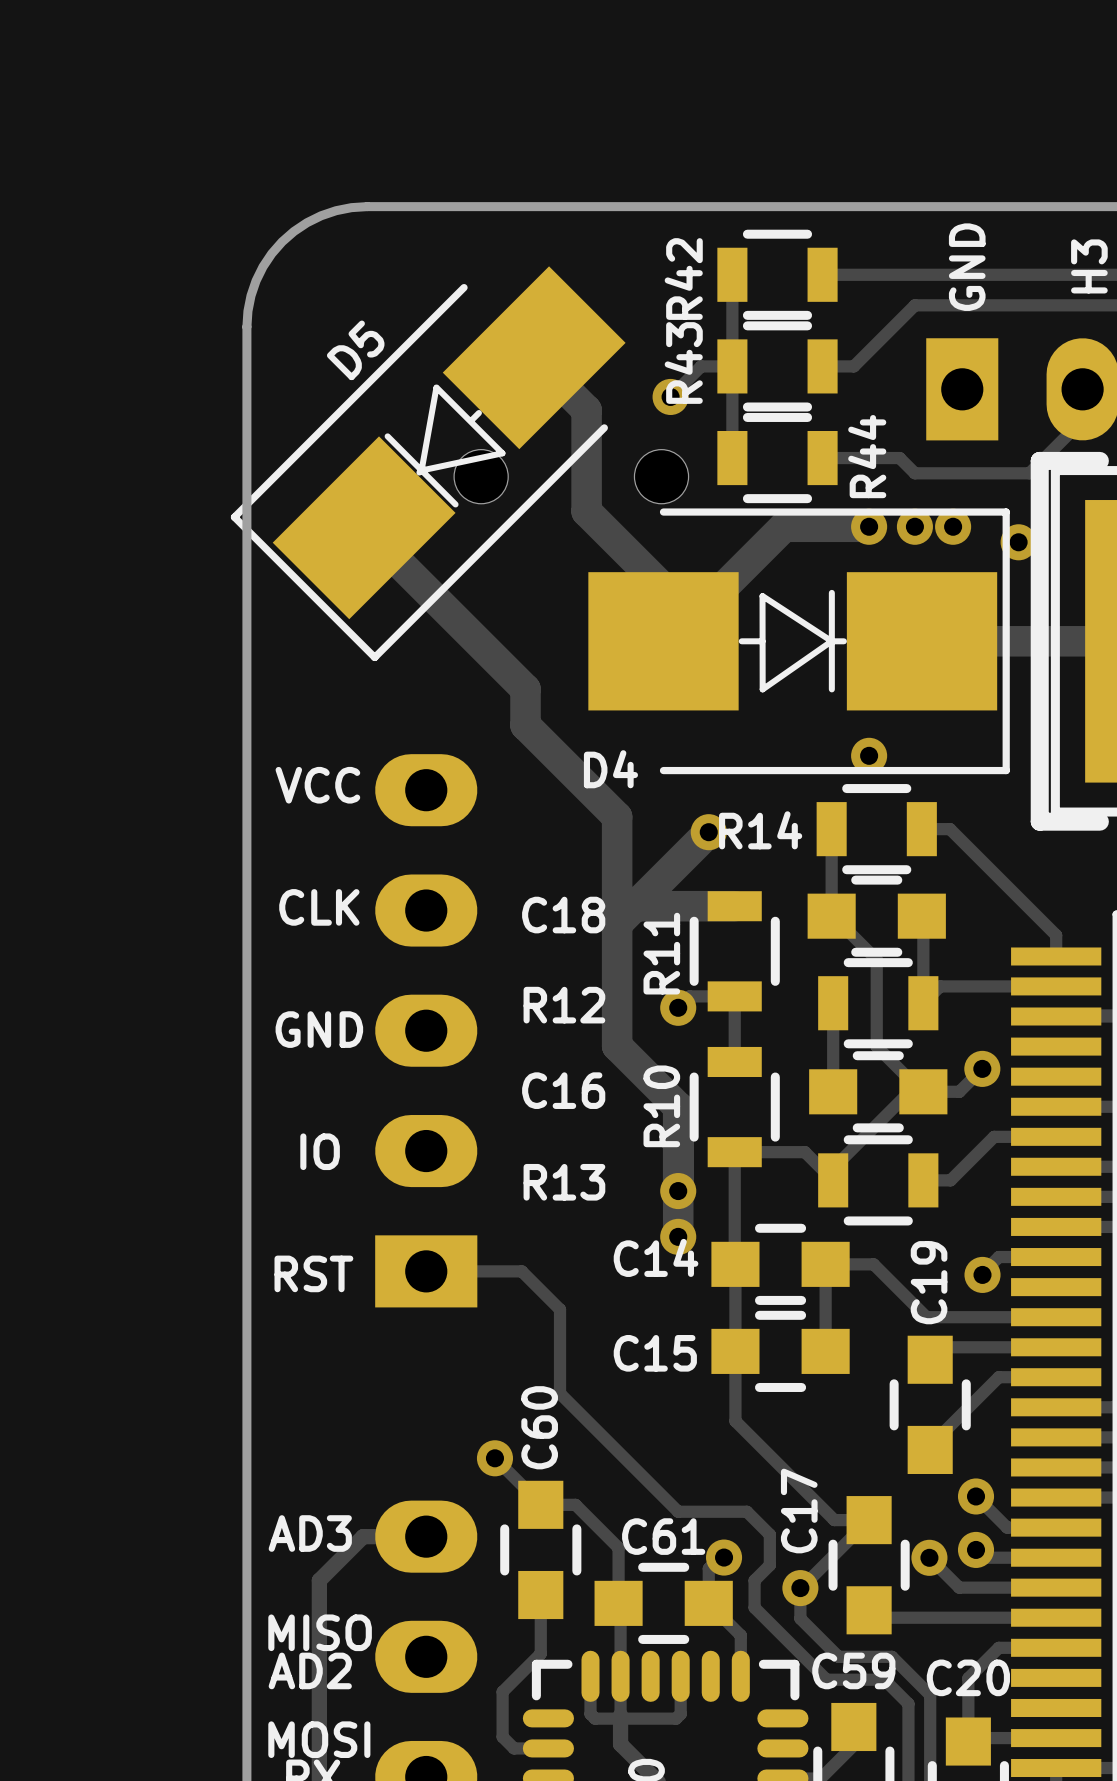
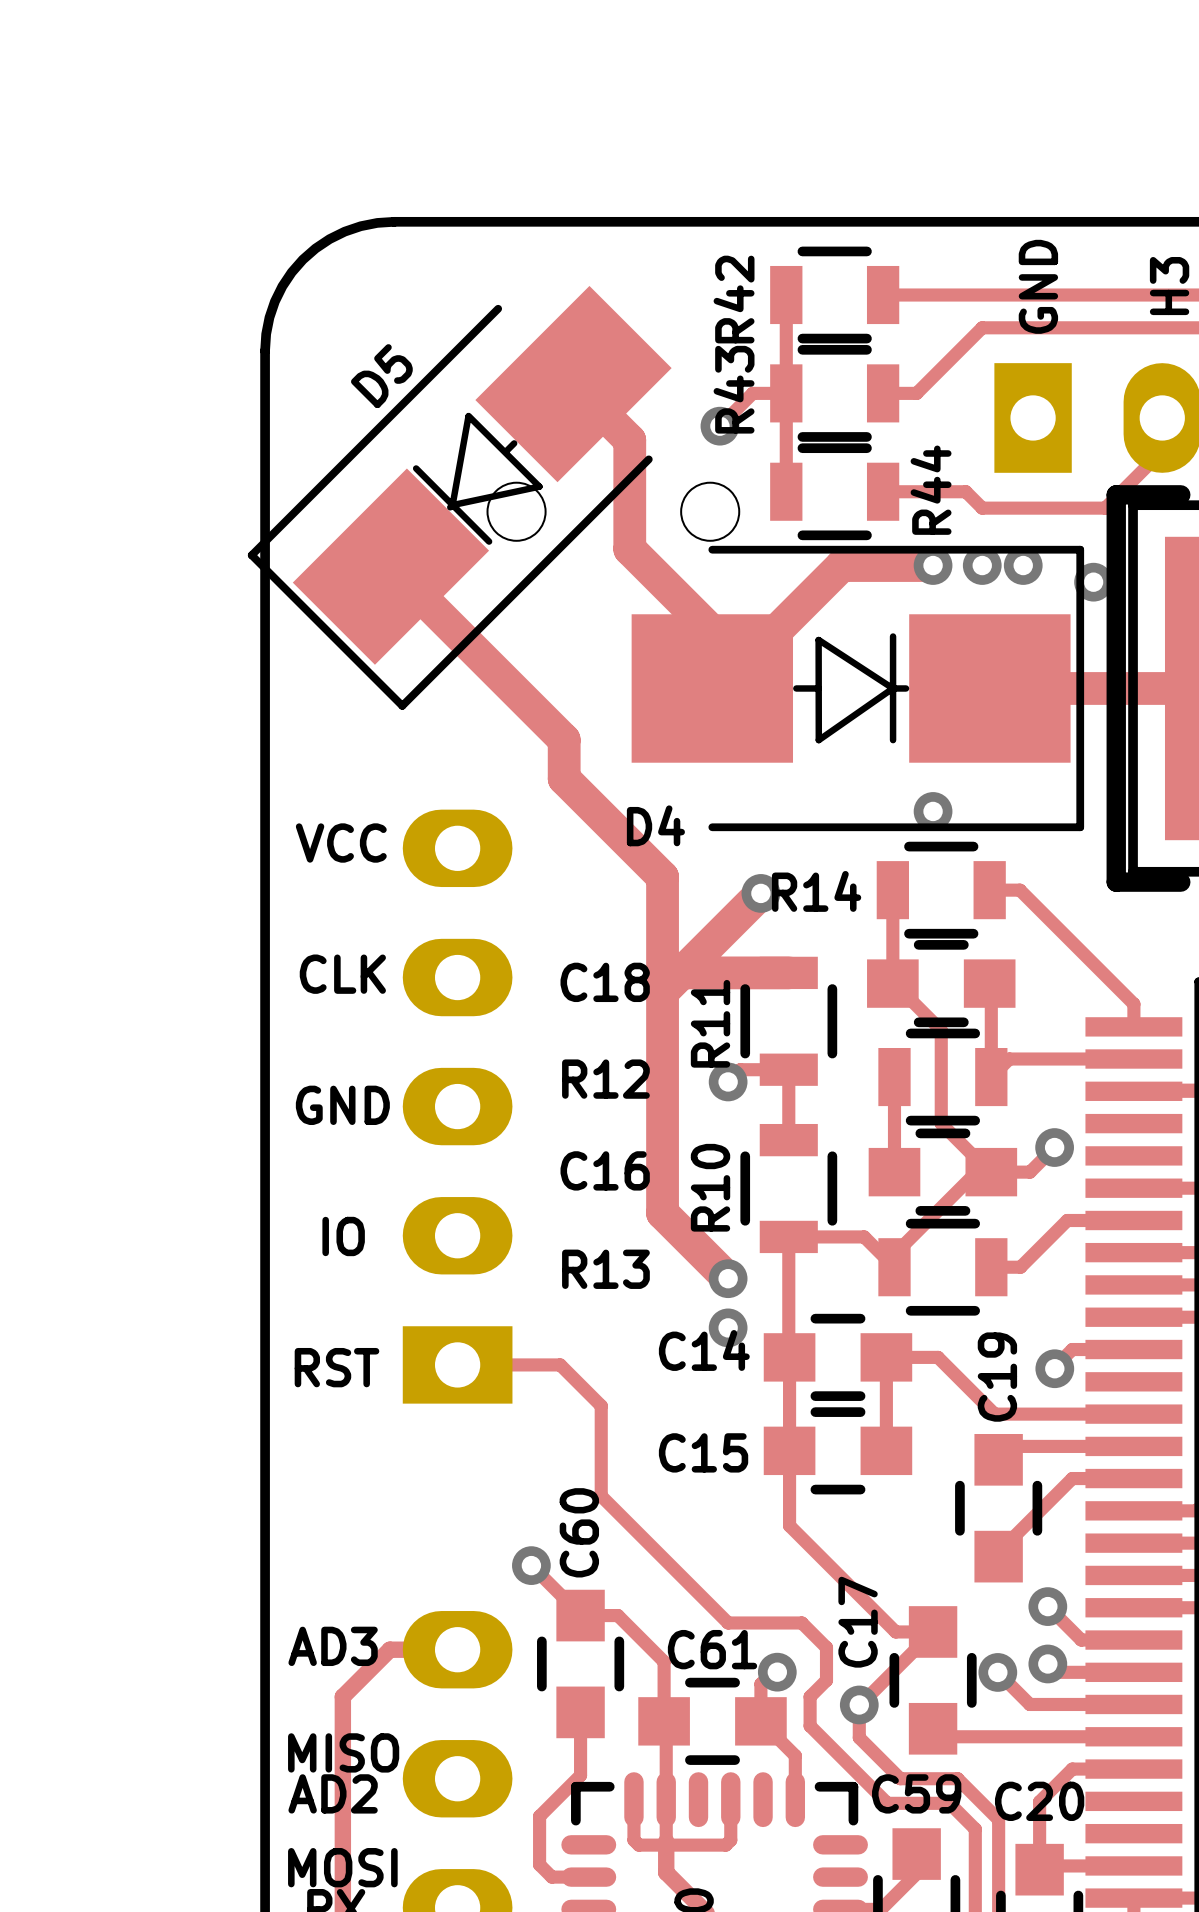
track: (617, 1045) (678, 1107) (678, 1236) -> (662, 1122) (662, 1213) (728, 1278)

